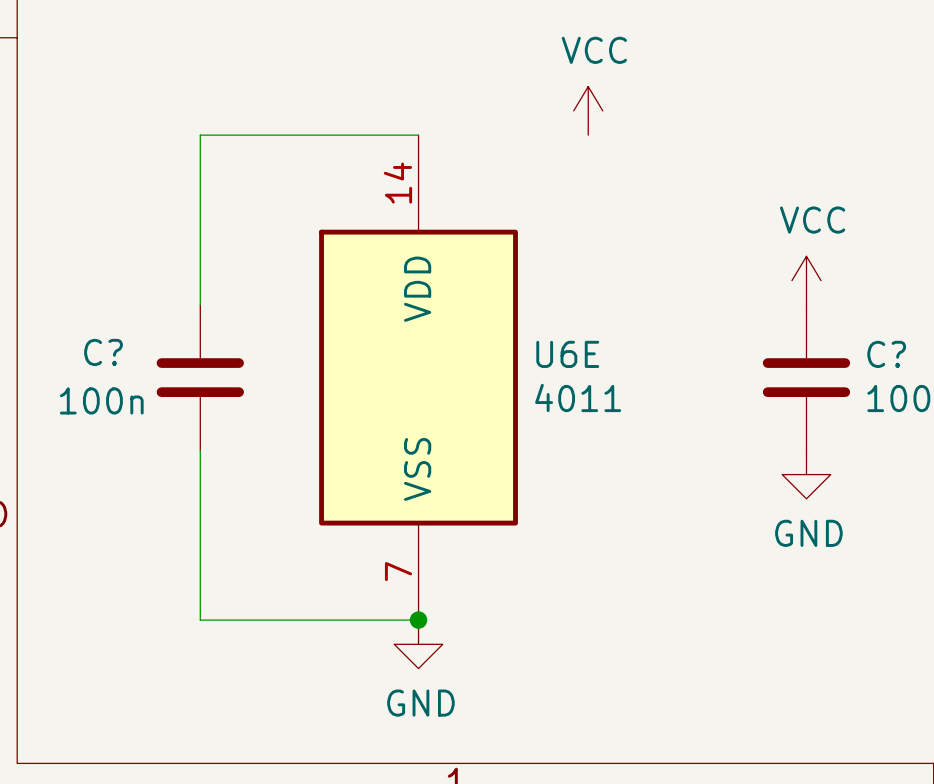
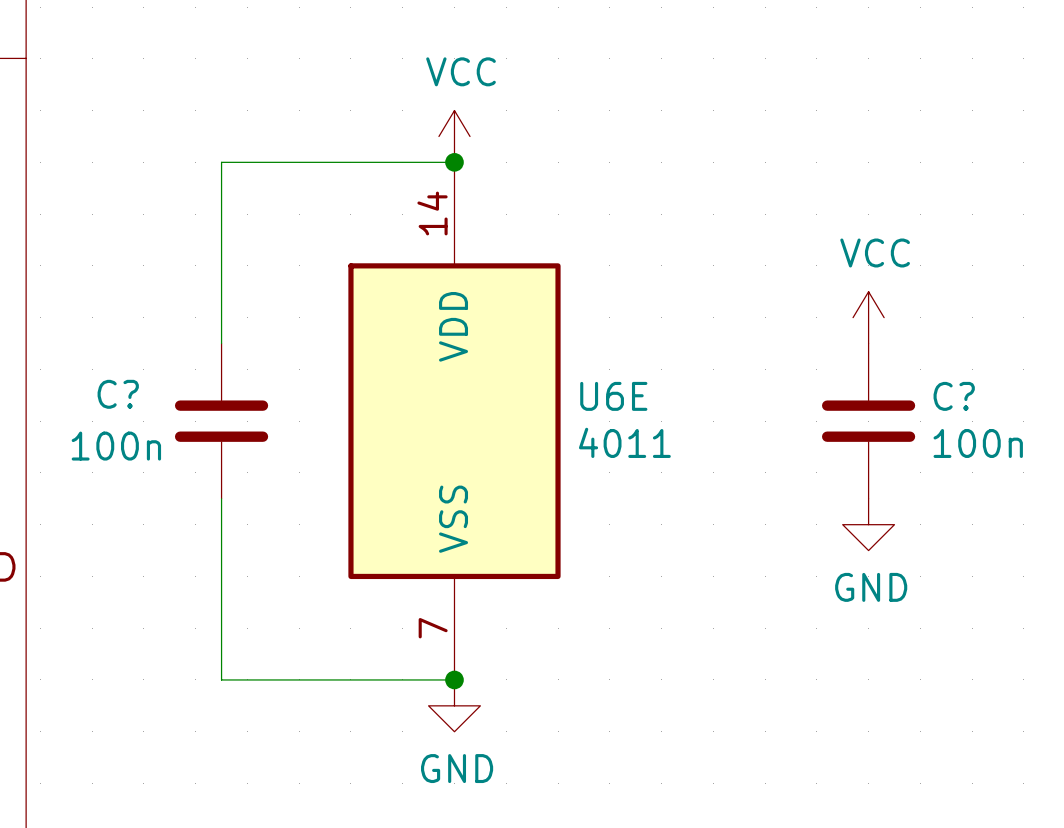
power symbol position: VCC (588, 110) -> VCC (454, 136)
junction: none -> (454, 162)

